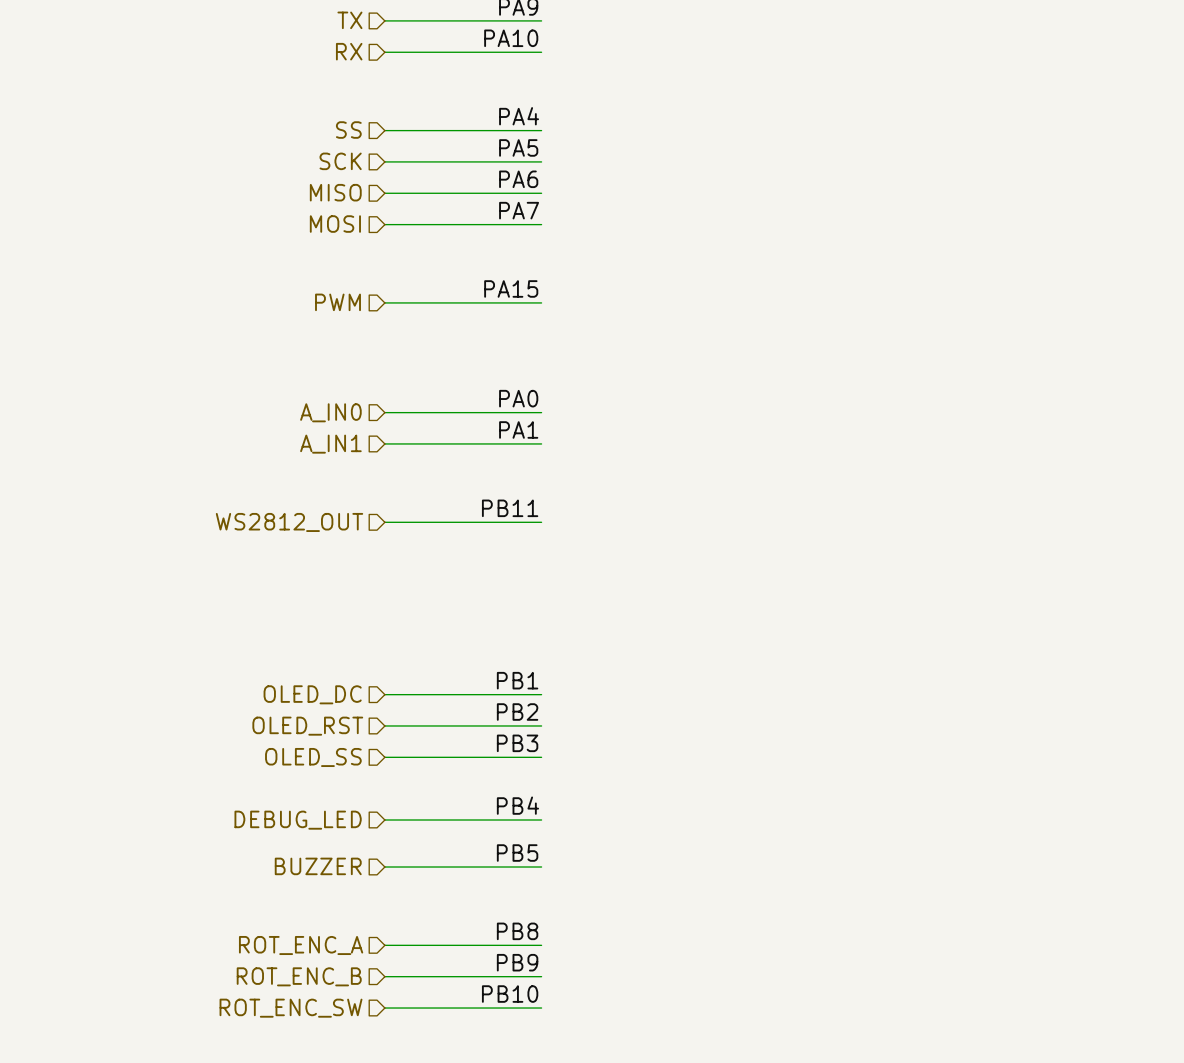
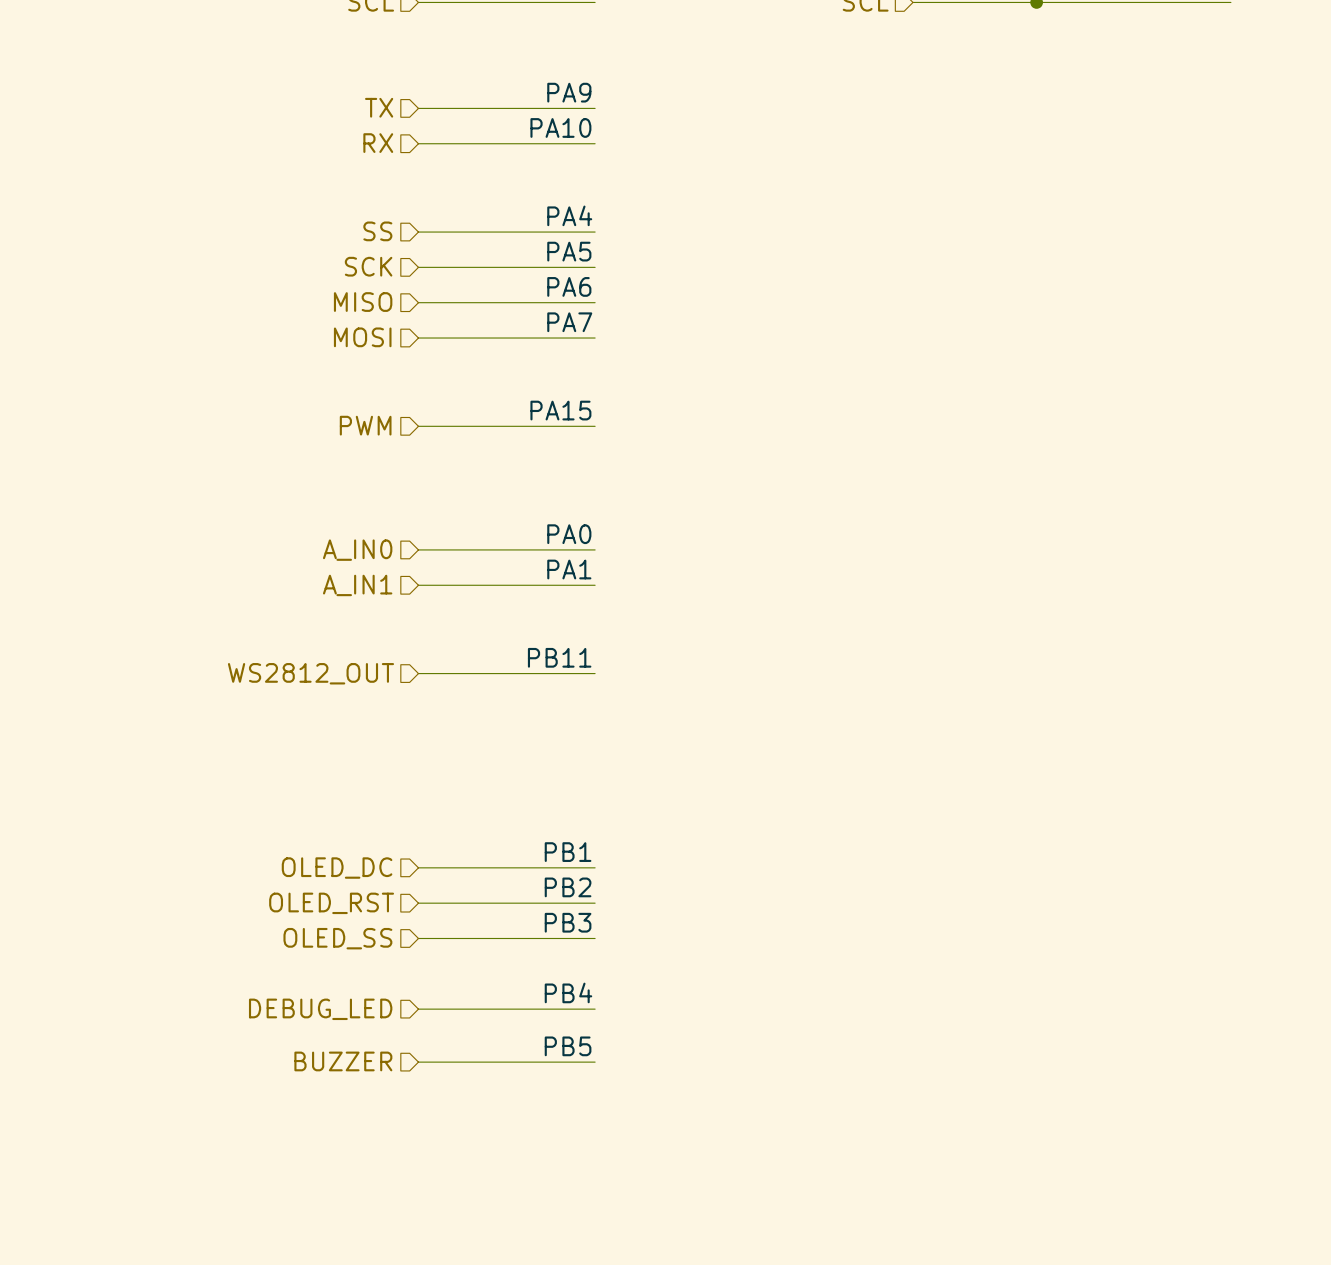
label: PB8 (517, 931) -> none
hierarchical label: ROT_ENC_A (301, 945) -> none
wire: (384, 945) (541, 945) -> none
label: PB9 (517, 962) -> none
hierarchical label: ROT_ENC_B (299, 976) -> none
wire: (384, 976) (541, 976) -> none
label: PB10 (510, 994) -> none
hierarchical label: ROT_ENC_SW (291, 1008) -> none
wire: (384, 1008) (541, 1008) -> none

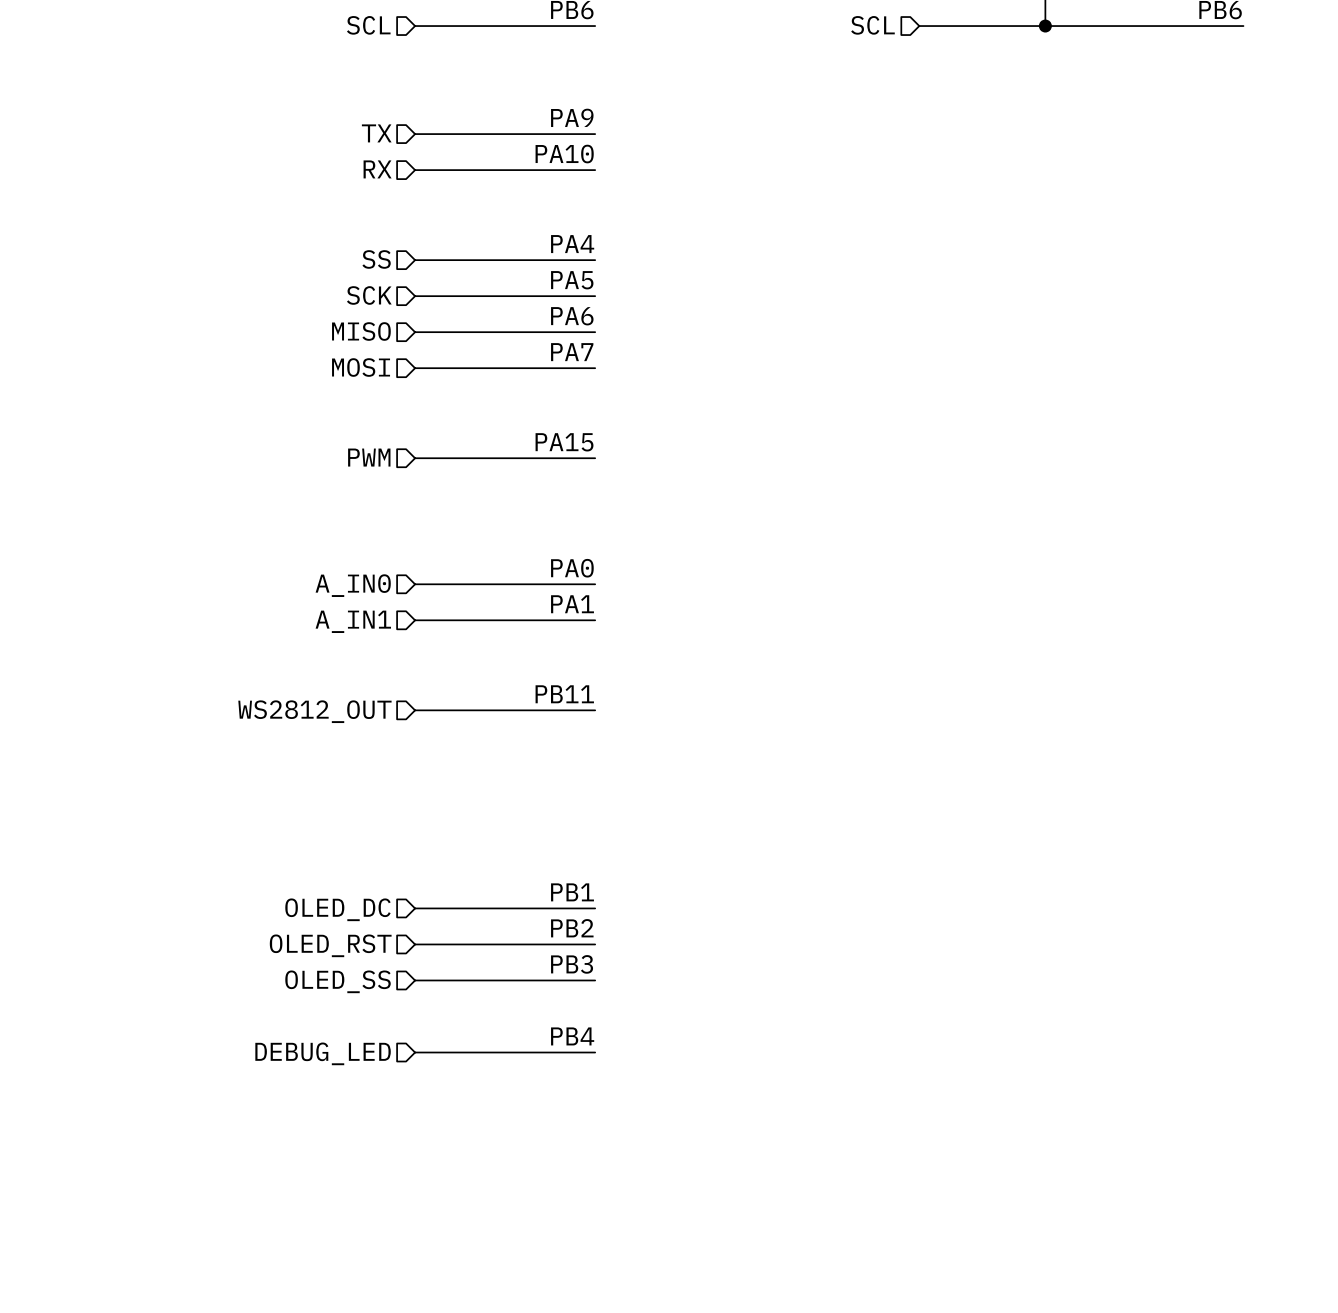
label: PB5 (568, 1046) -> none
hierarchical label: BUZZER (343, 1061) -> none
wire: (418, 1062) (595, 1062) -> none

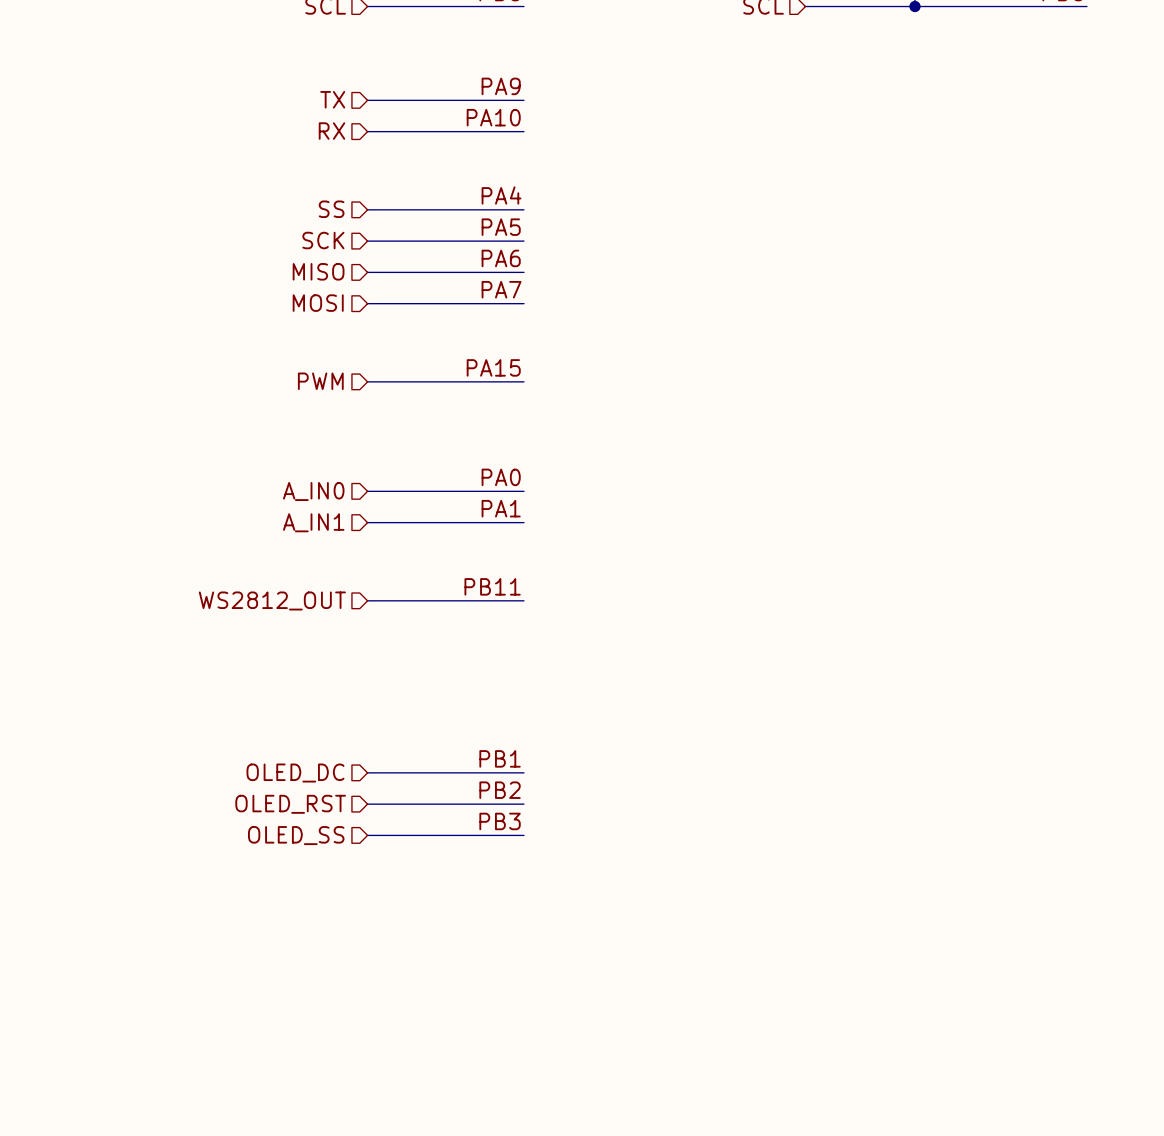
label: PB4 (572, 1036) -> none
wire: (415, 1052) (595, 1052) -> none
hierarchical label: DEBUG_LED (323, 1053) -> none

